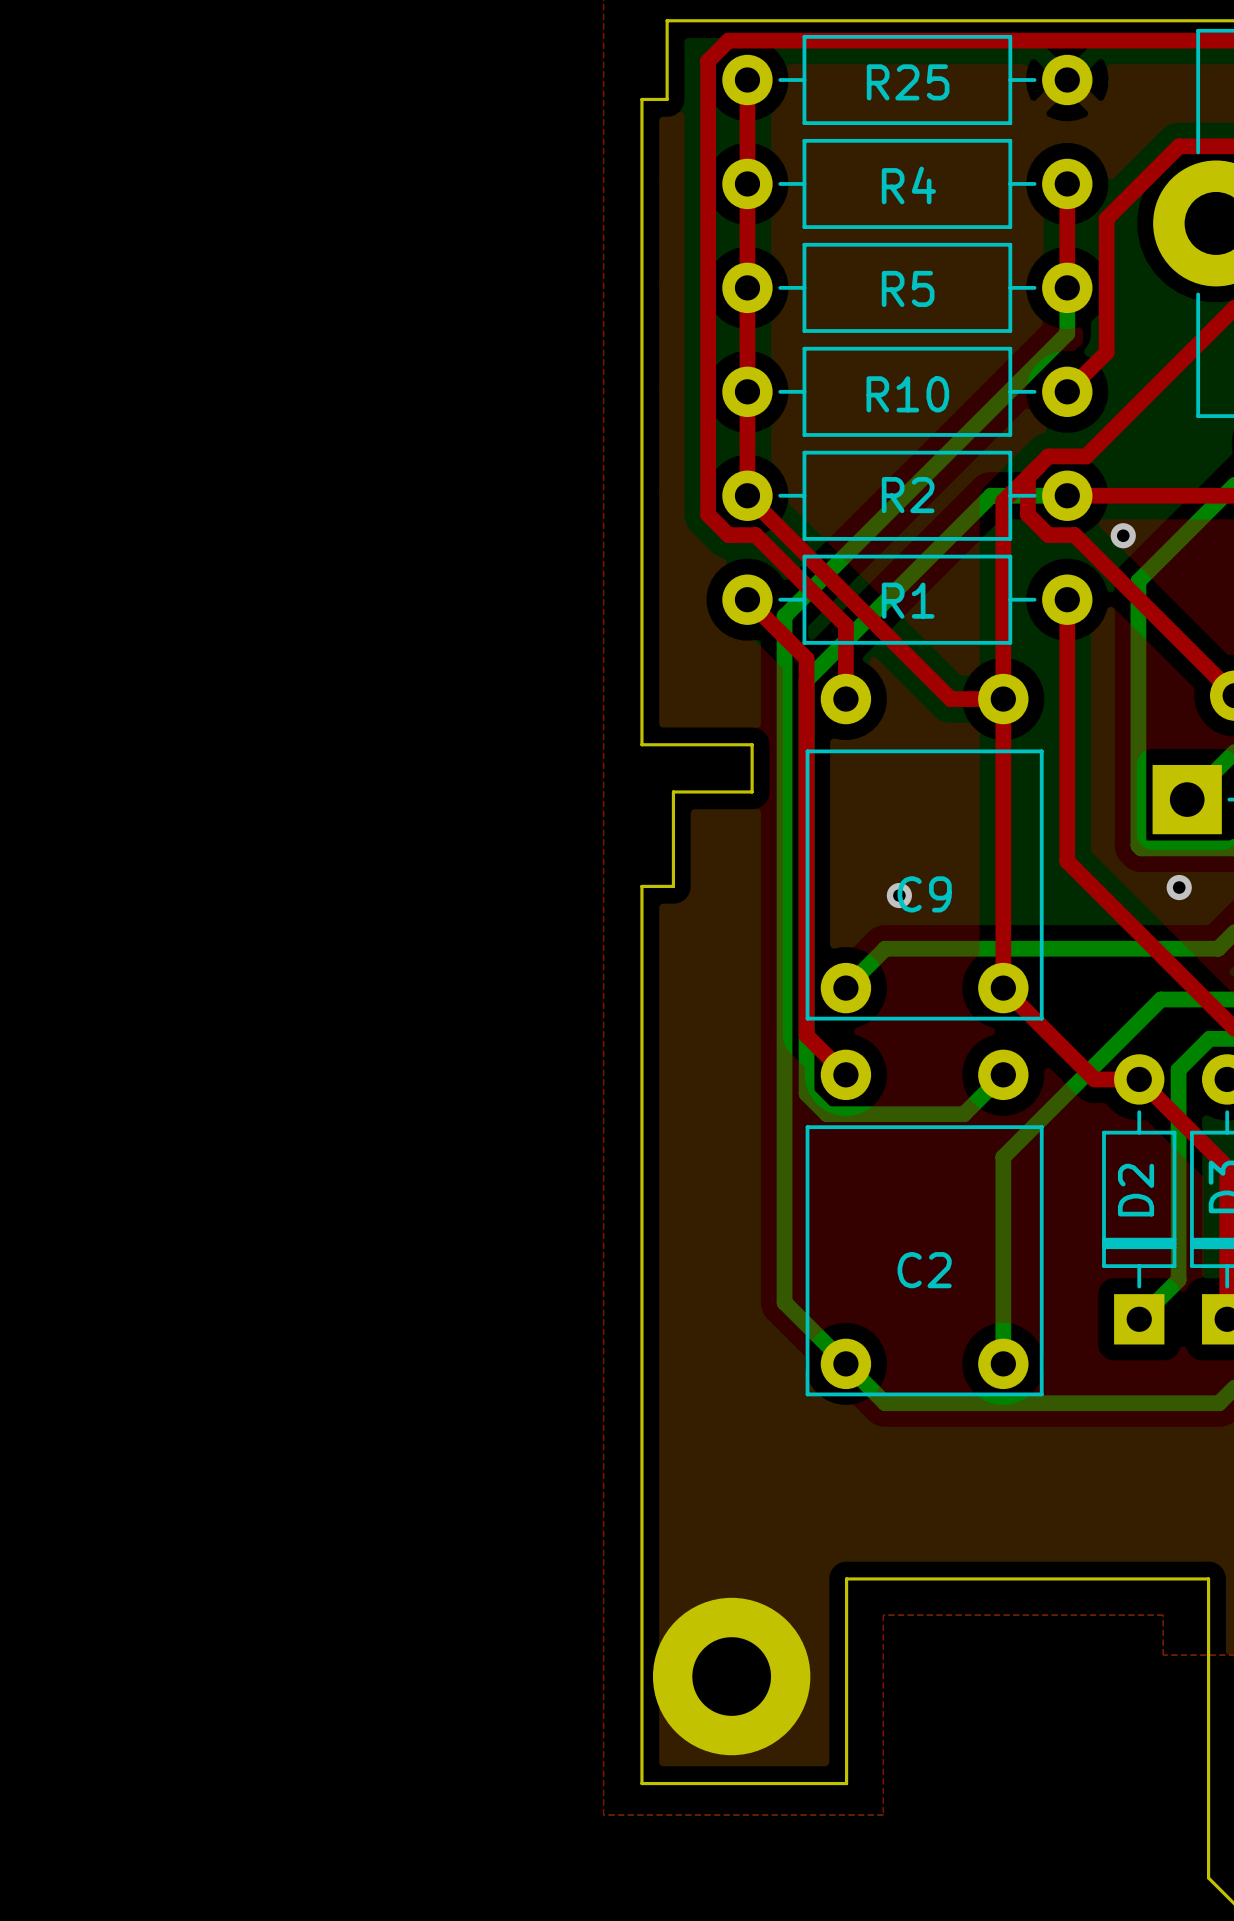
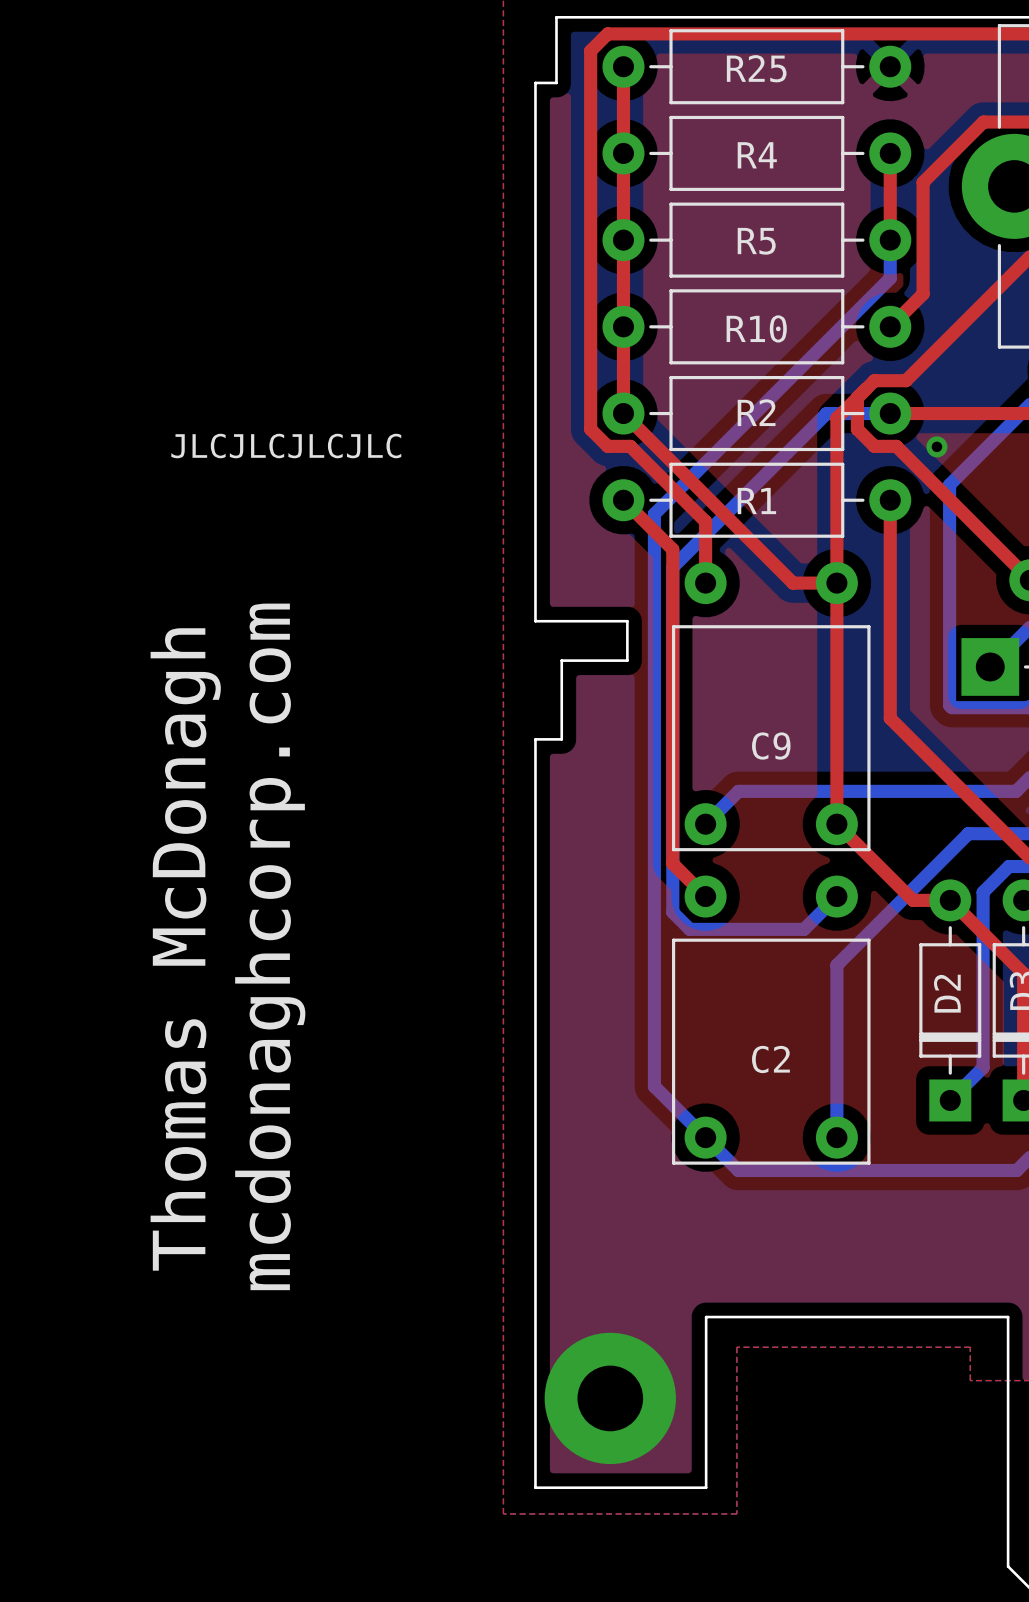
text: none -> JLCJLCJLCJLC (286, 446)
via: (1179, 887) -> none
via: (899, 895) -> none
text: none -> mcdonaghcorp.com (270, 946)
text: none -> Thomas McDonagh (185, 949)

